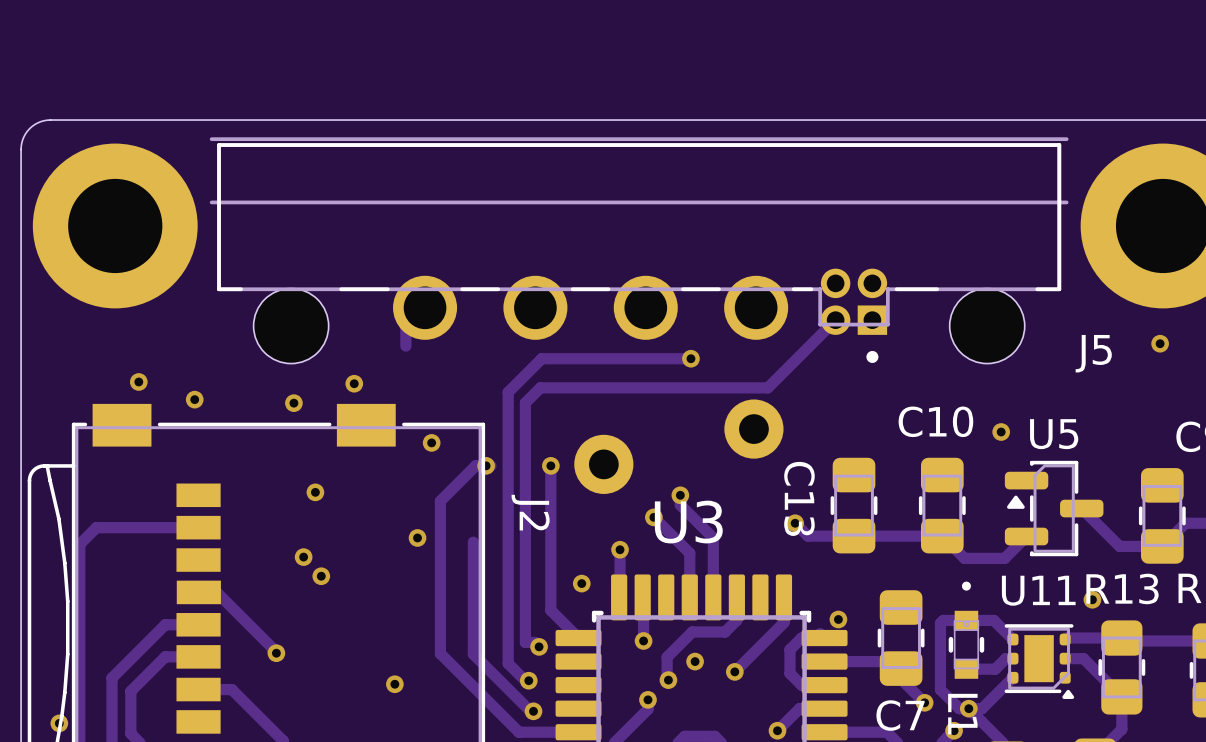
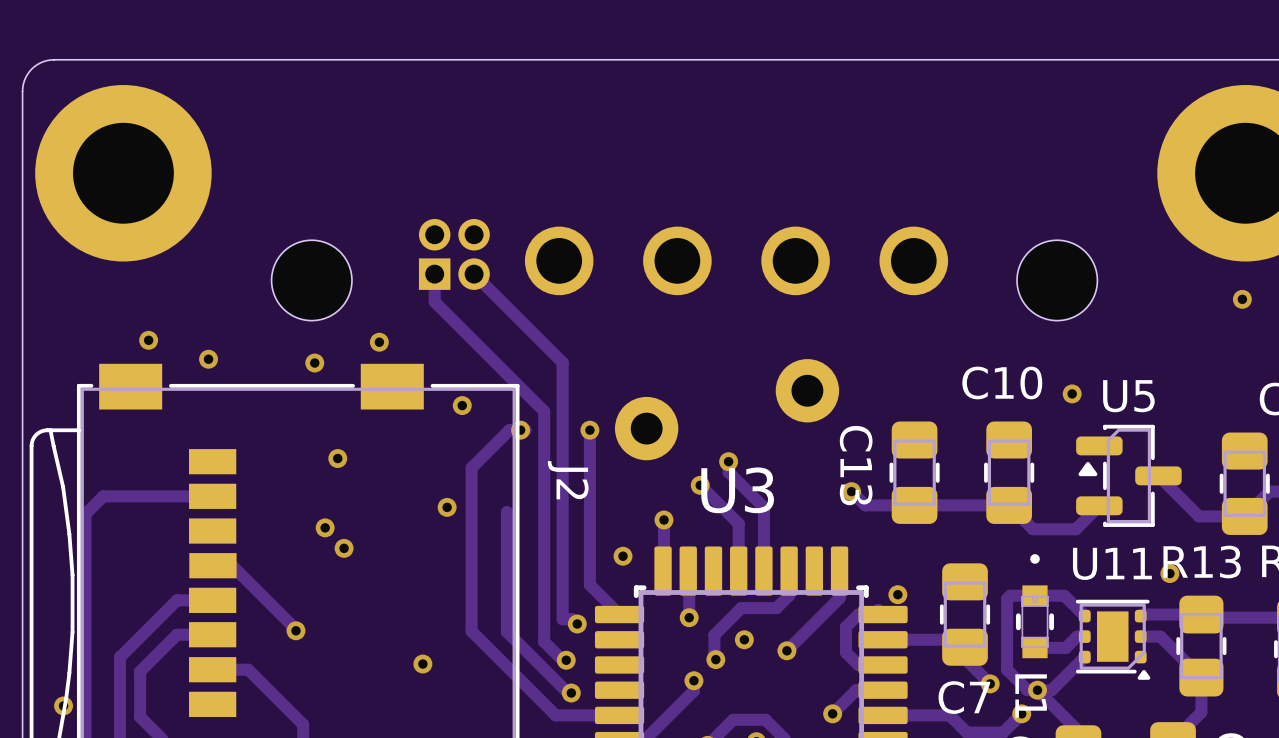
J5 side: bottom (639, 250) -> top (684, 269)
track: (835, 320) (767, 387) (540, 387) (525, 402) -> (474, 274) (562, 362)
track: (690, 358) (541, 358) (508, 392) (508, 448) -> (434, 301) (544, 411)
via: (690, 358) -> none

